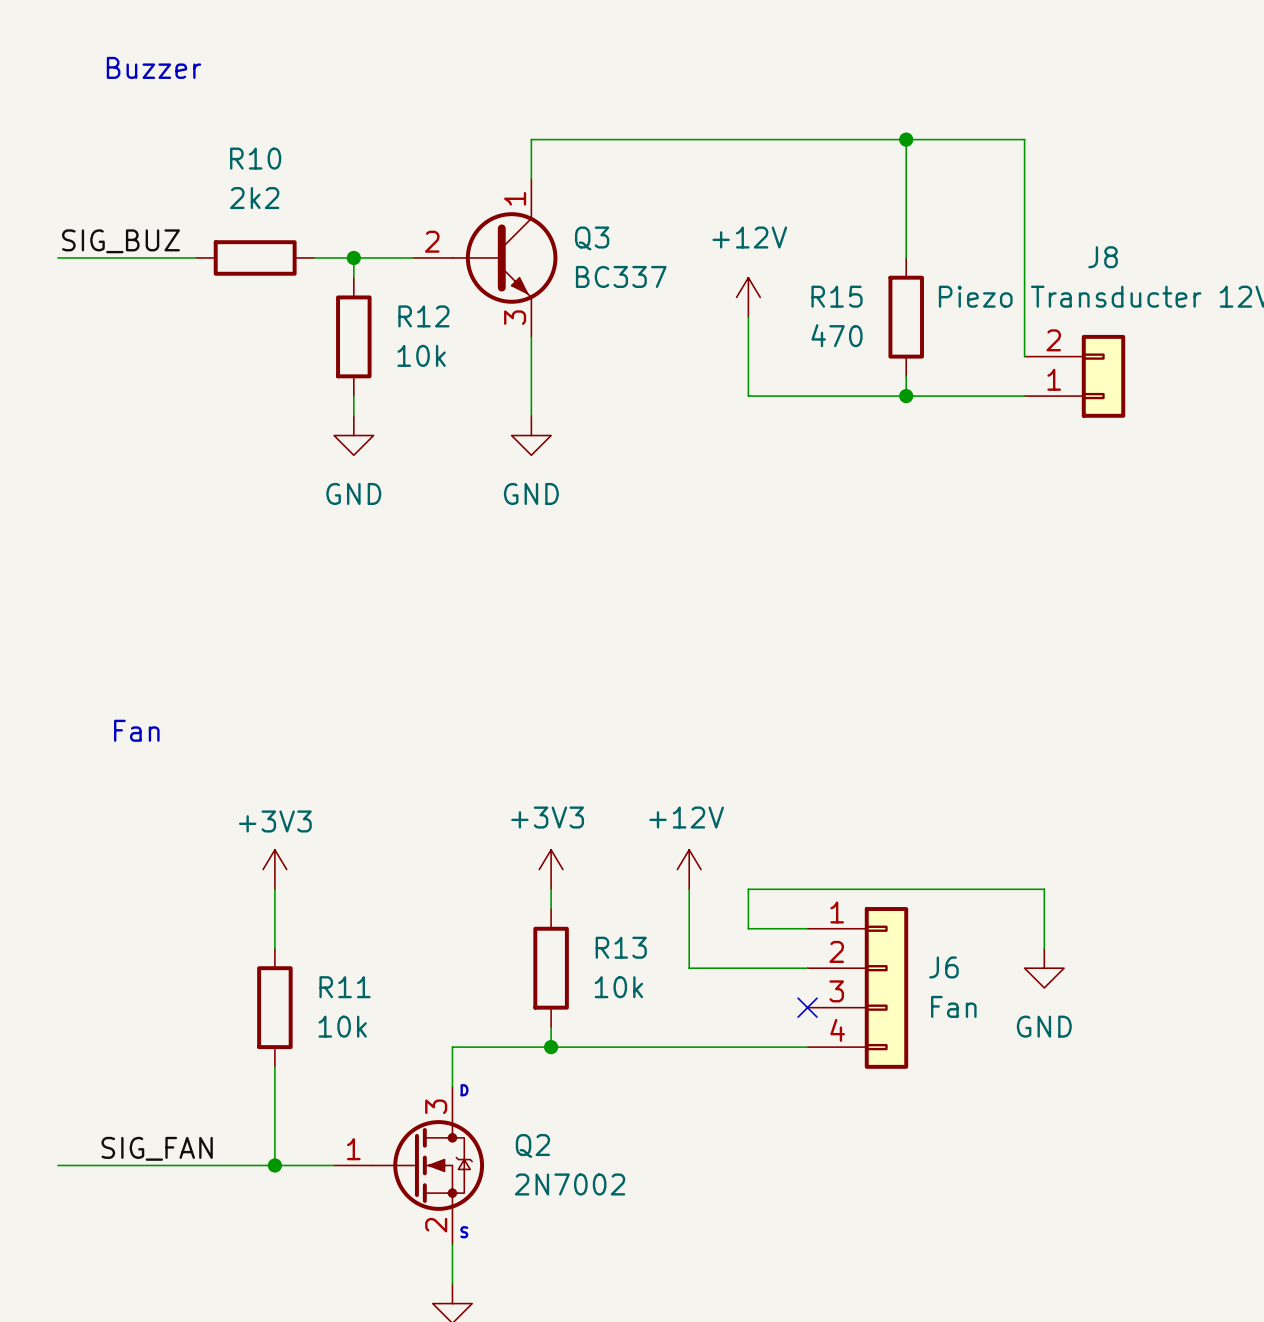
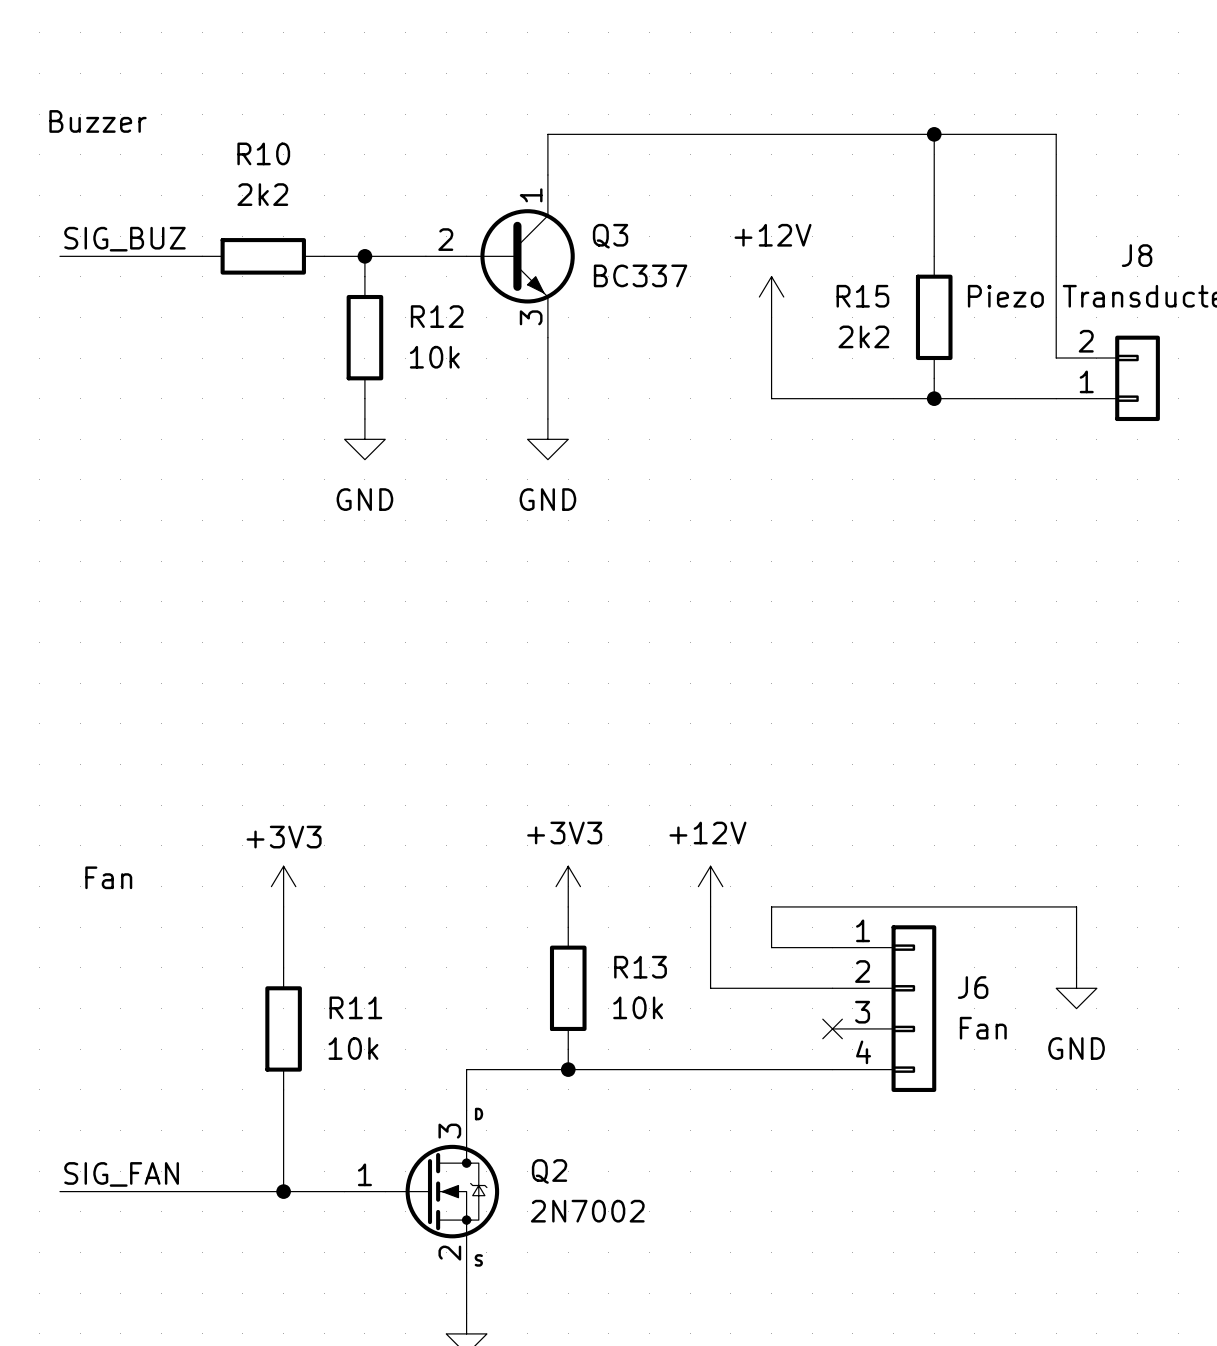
text position: Buzzer (153, 67) -> Buzzer (98, 121)
R15 value: 470 (837, 335) -> 2k2 (863, 336)
text position: Fan (136, 730) -> Fan (108, 877)
label position: SIG_FAN (157, 1148) -> SIG_FAN (121, 1174)

